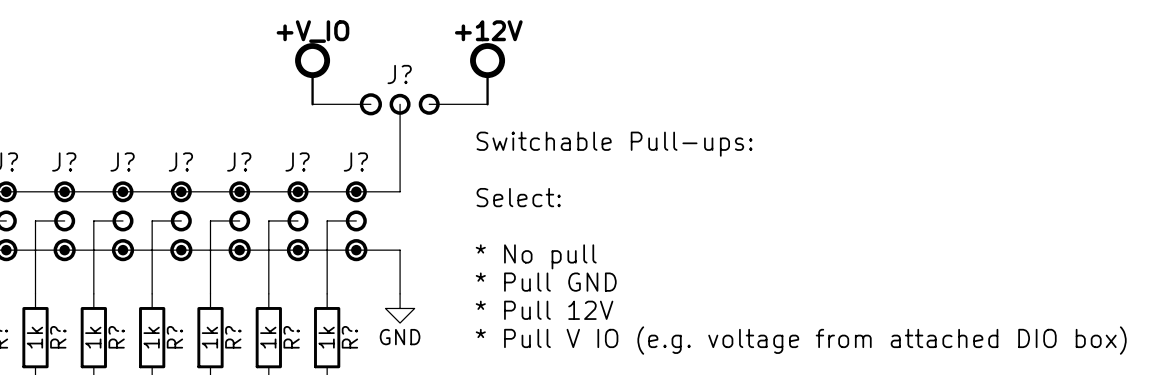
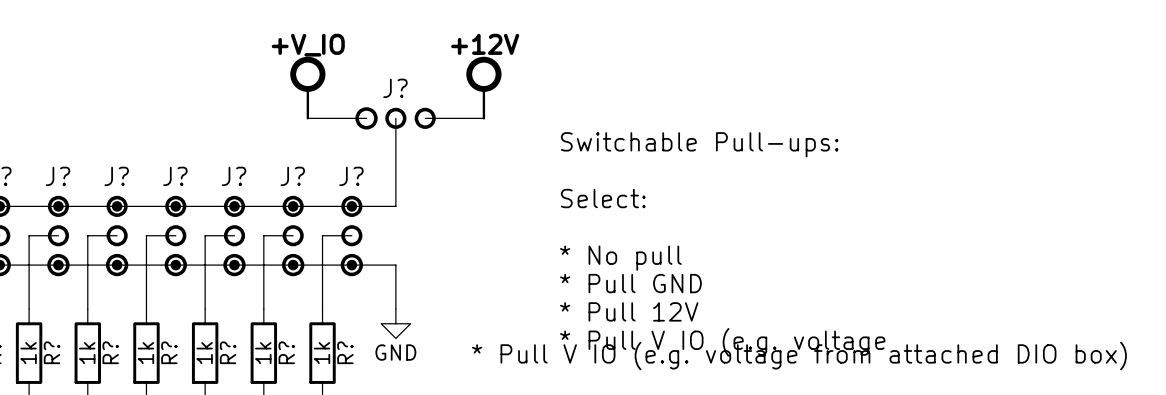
text position: Switchable Pull-ups: (614, 144) -> Switchable Pull-ups: (699, 144)
text position: Select: (518, 197) -> Select: (603, 198)
text position: * No pull (536, 256) -> * No pull (620, 258)
text position: * Pull GND (546, 282) -> * Pull GND (630, 283)
text position: * Pull 12V (544, 310) -> * Pull 12V (629, 311)
text: none -> * Pull V IO (e.g. voltage (722, 342)

